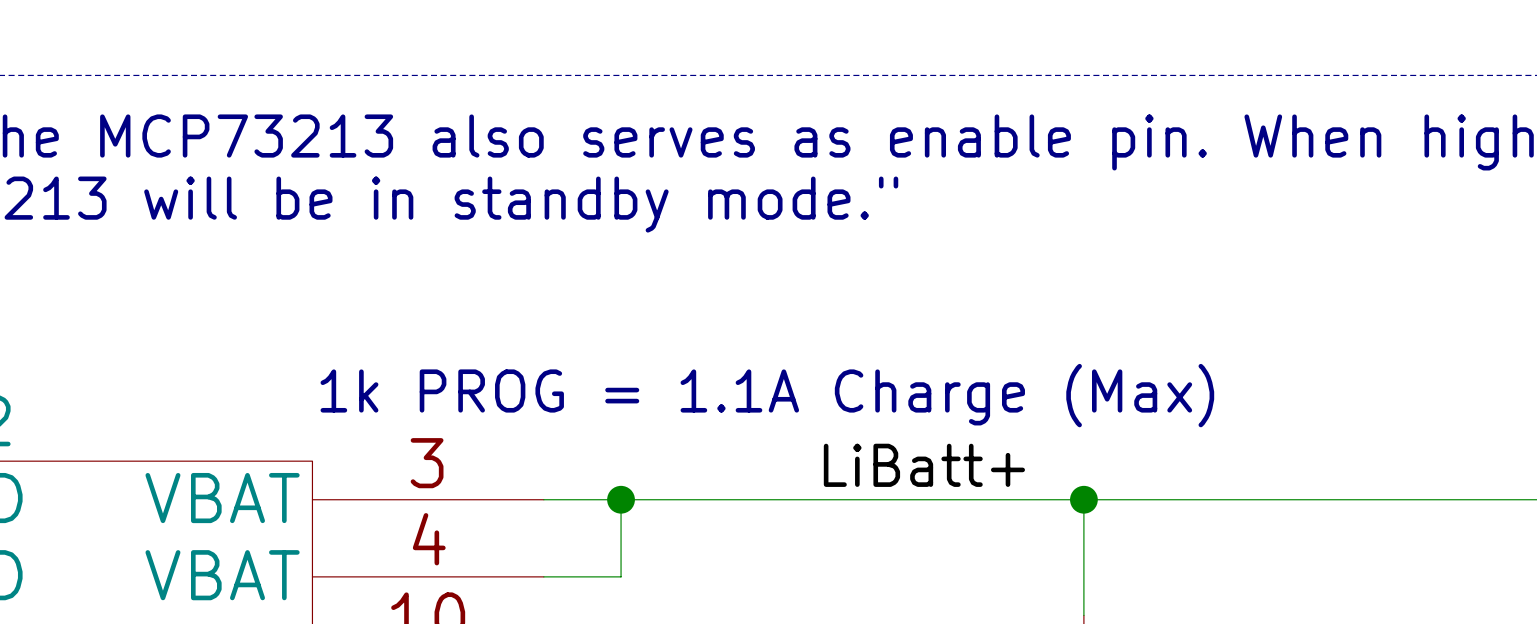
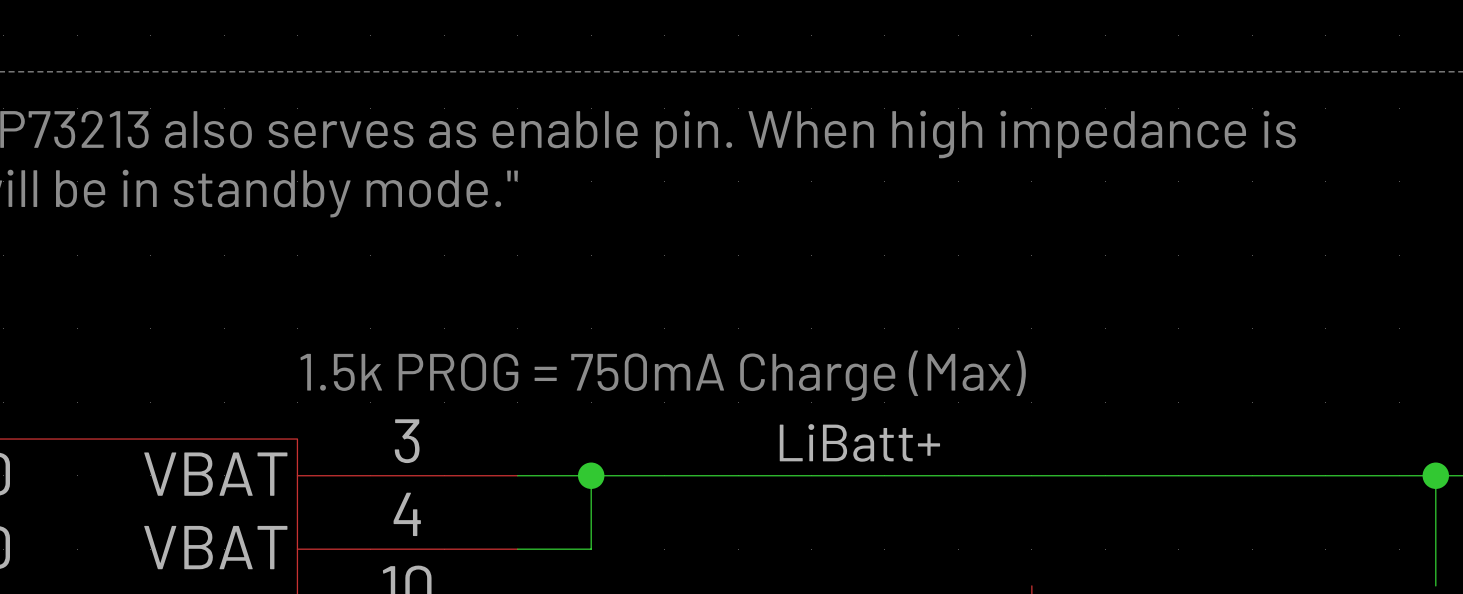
text: 1k PROG = 1.1A Charge (Max) (767, 395) -> 1.5k PROG = 750mA Charge (Max) (663, 375)
wire: (1083, 499) (1083, 615) -> (1435, 475) (1435, 585)
junction: (1083, 499) -> none
junction: none -> (1435, 475)

